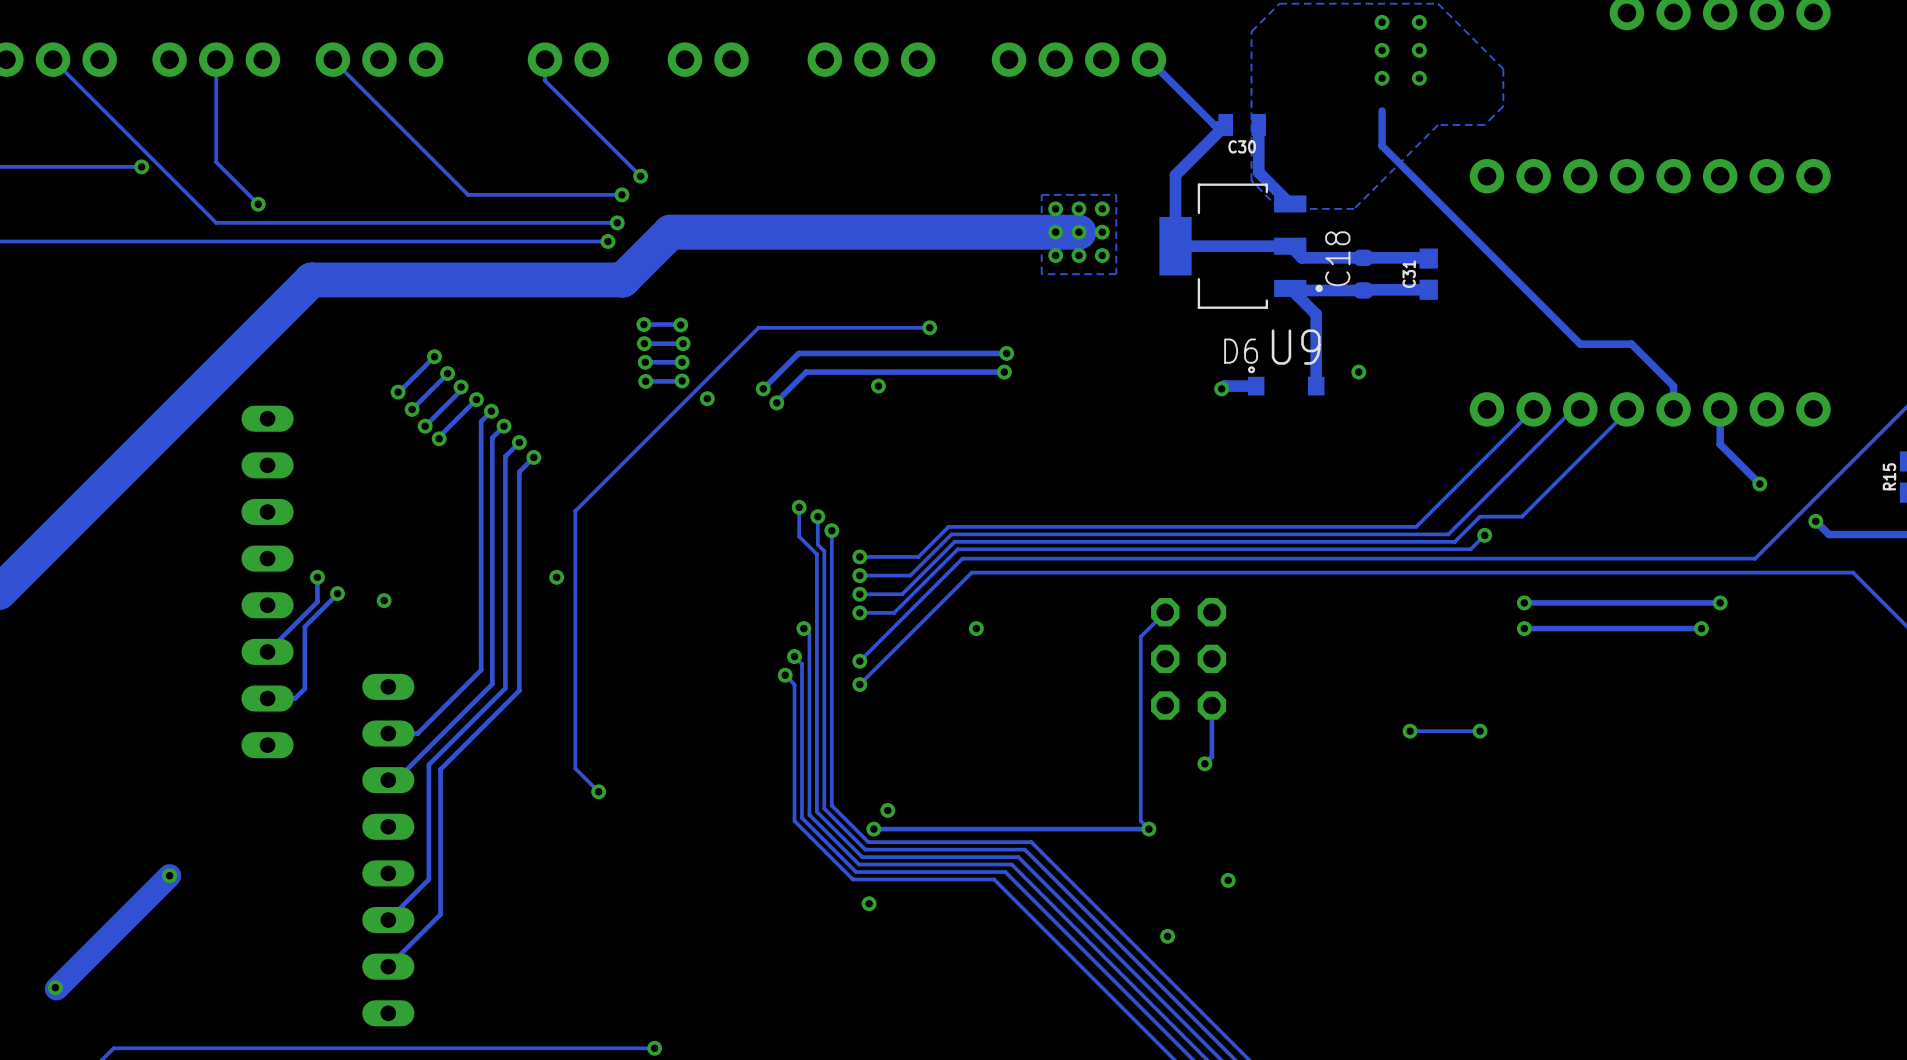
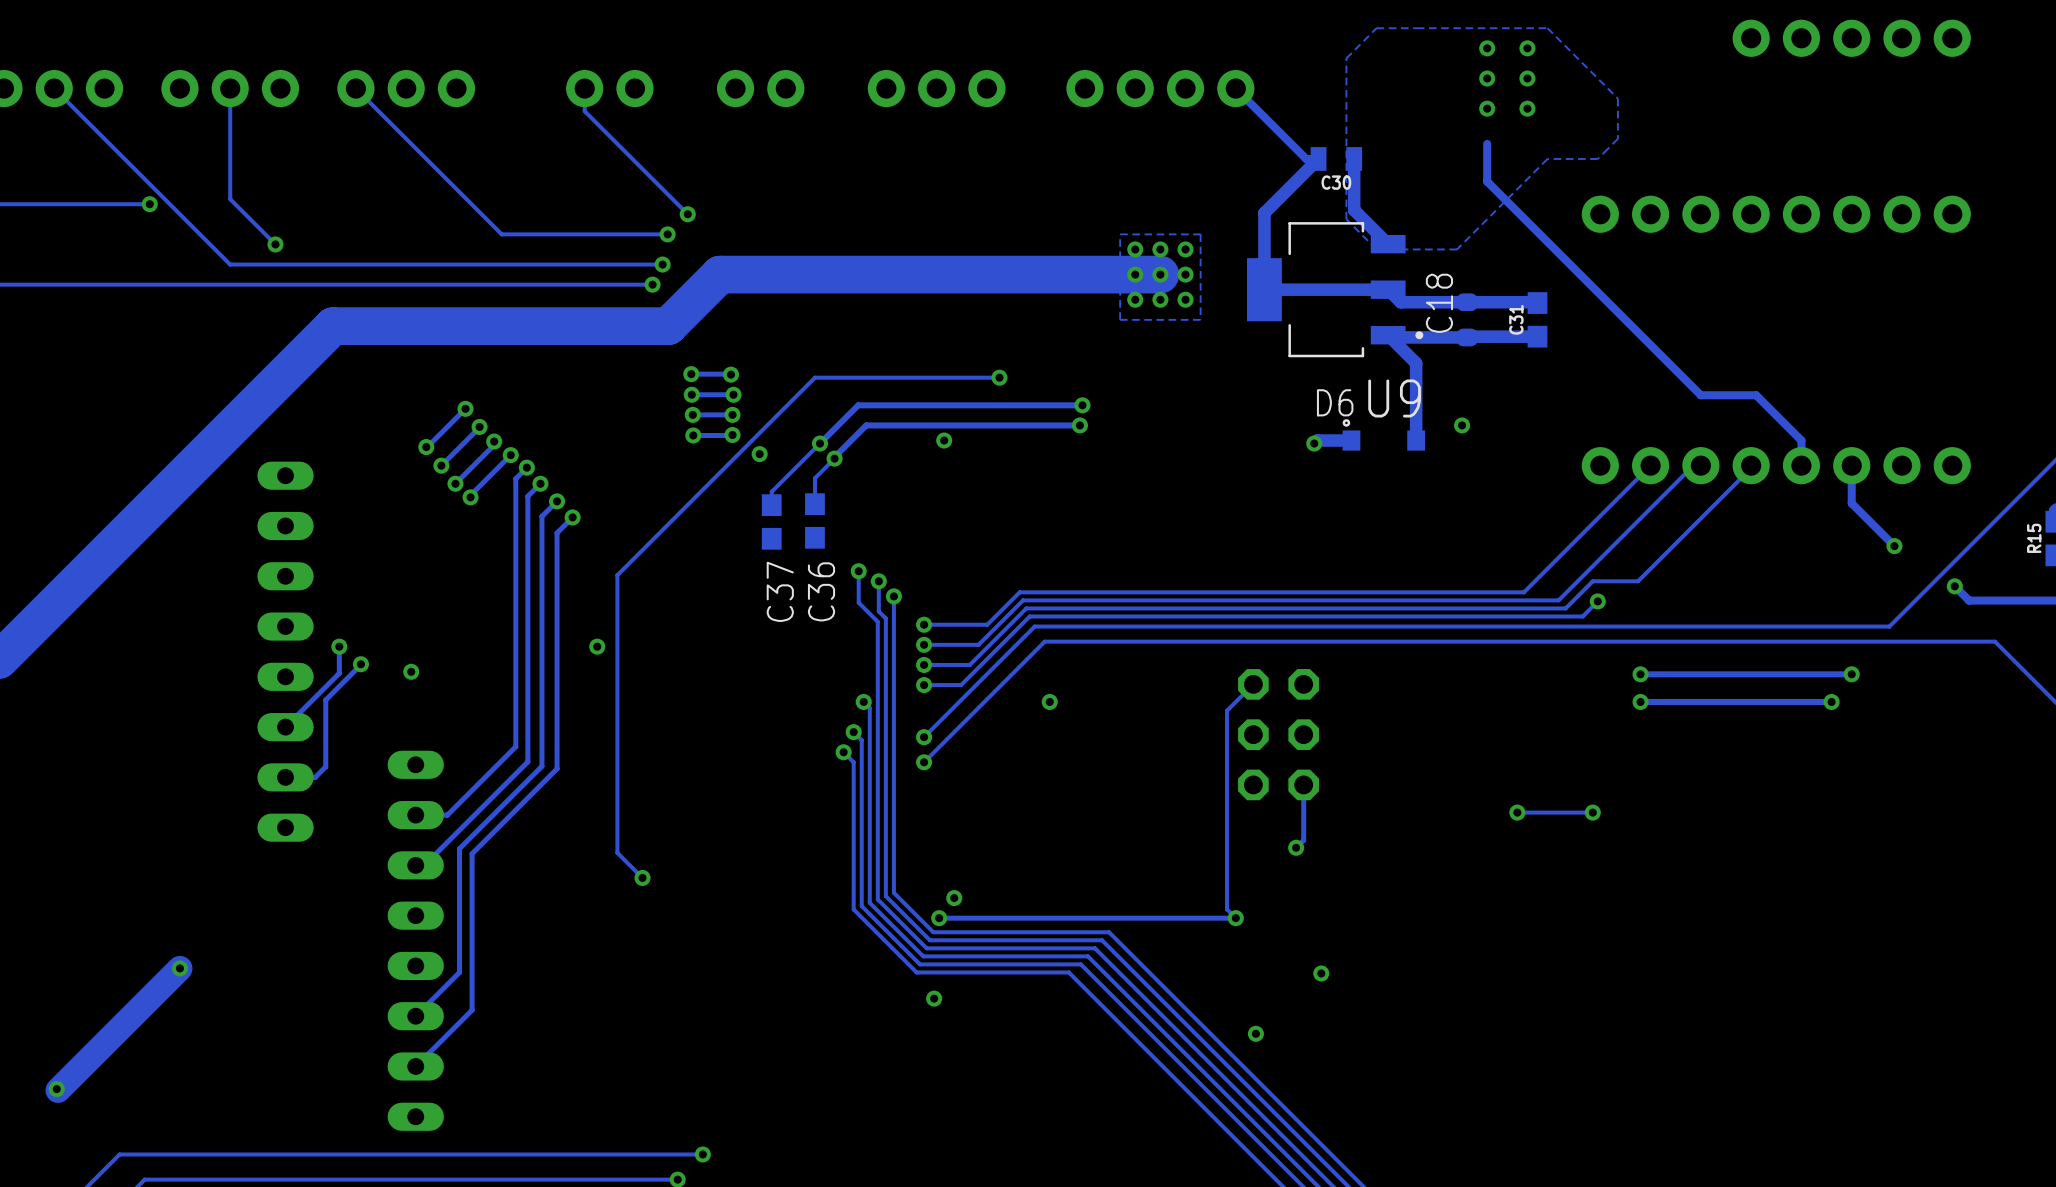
track: none -> (820, 443) (771, 491) (771, 505)
track: none -> (834, 458) (814, 478) (814, 504)
C36: none -> (814, 520)
C37: none -> (771, 521)

